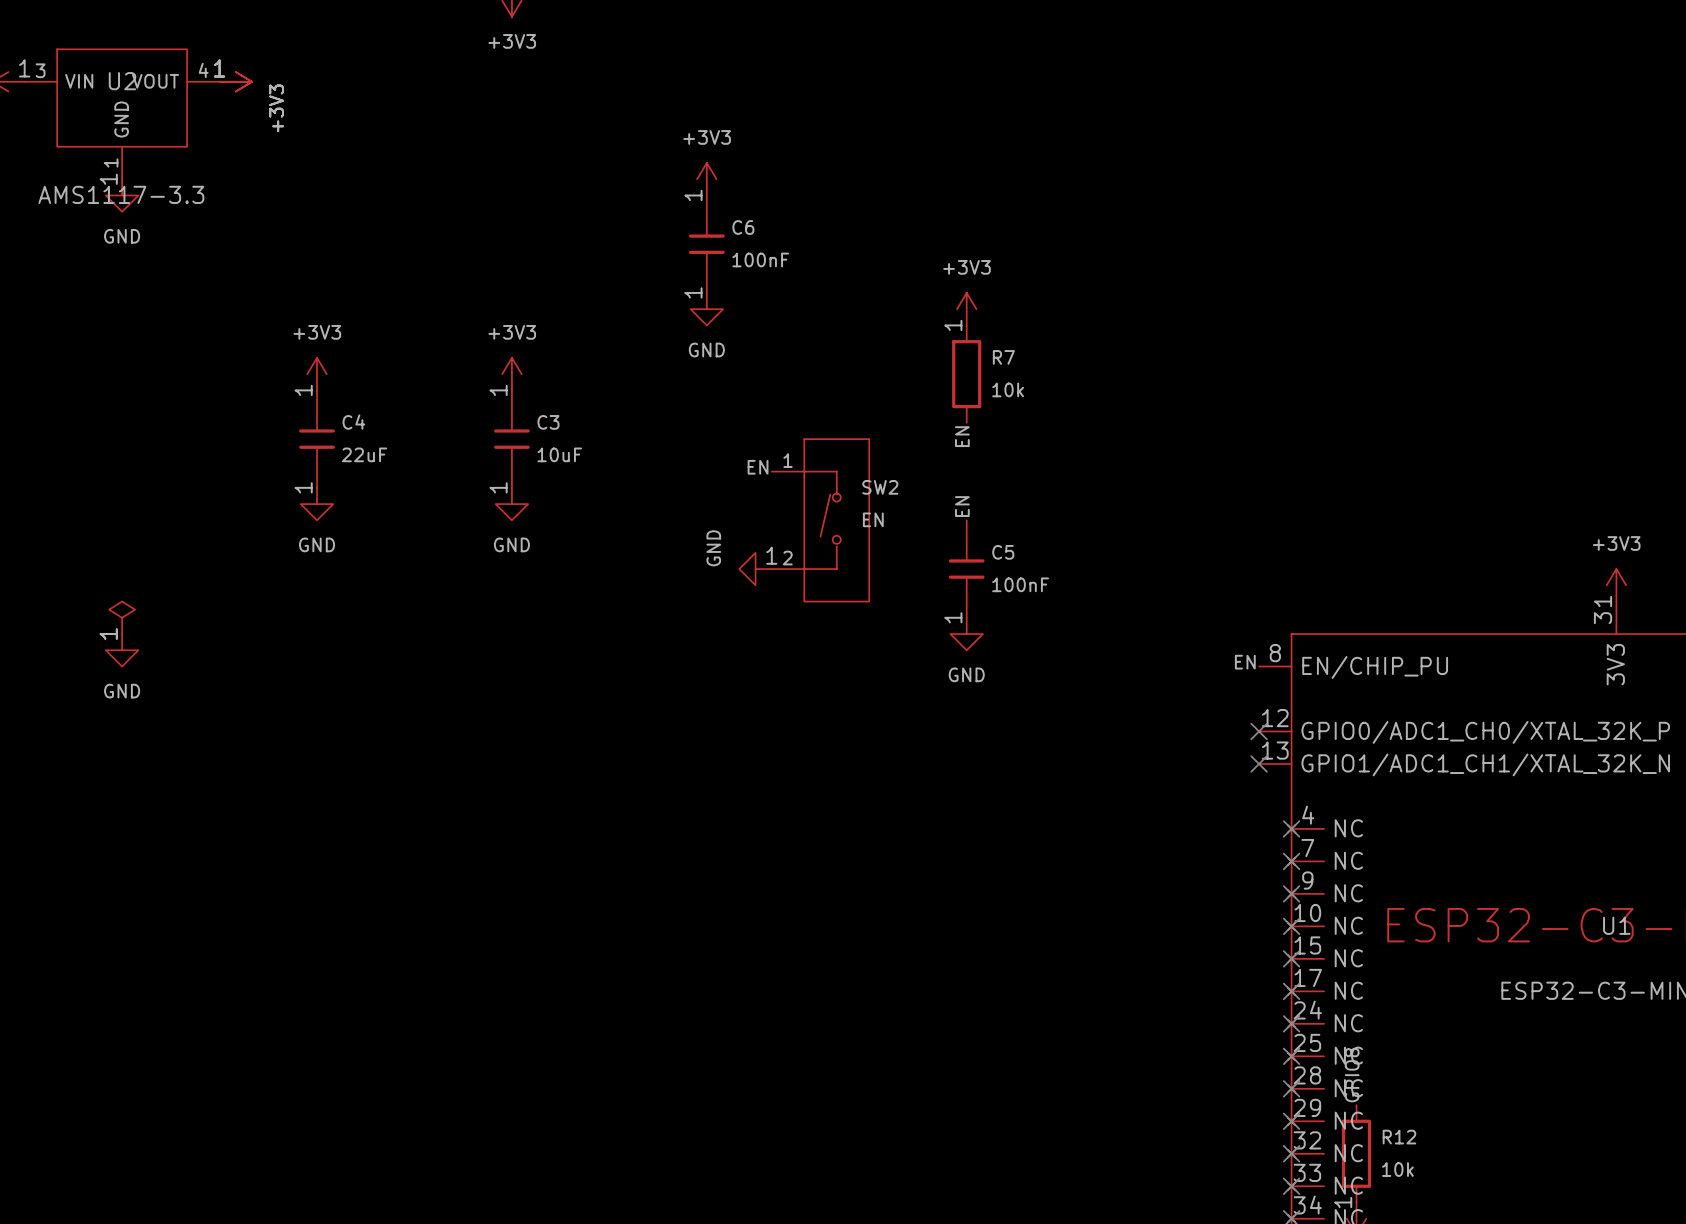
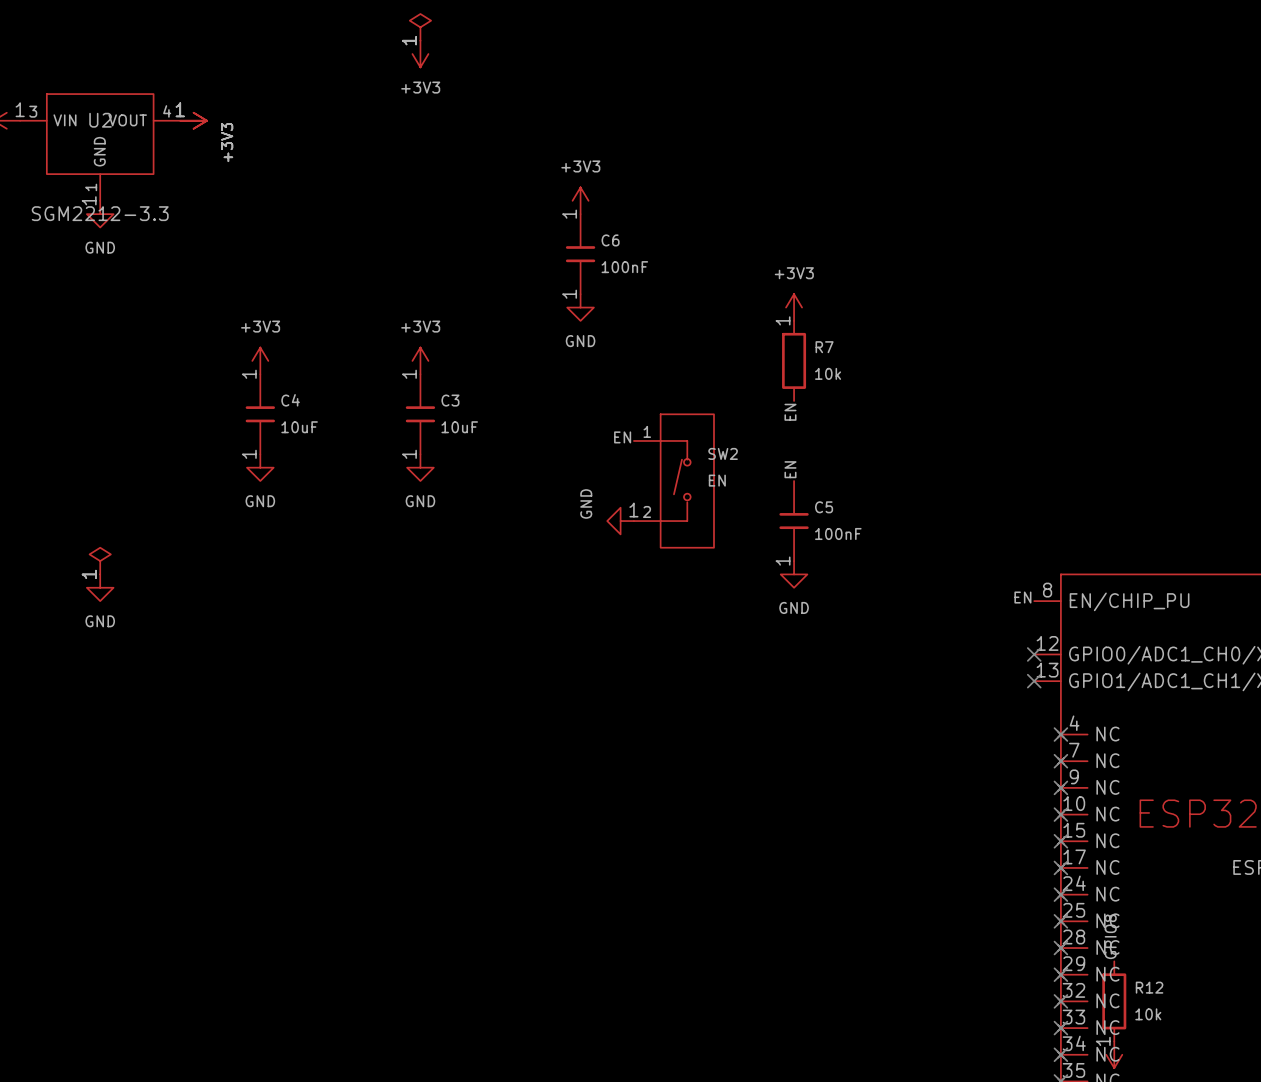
U2 value: AMS1117-3.3 (121, 194) -> SGM2212-3.3 (100, 213)
C4 value: 22uF (364, 454) -> 10uF (299, 427)

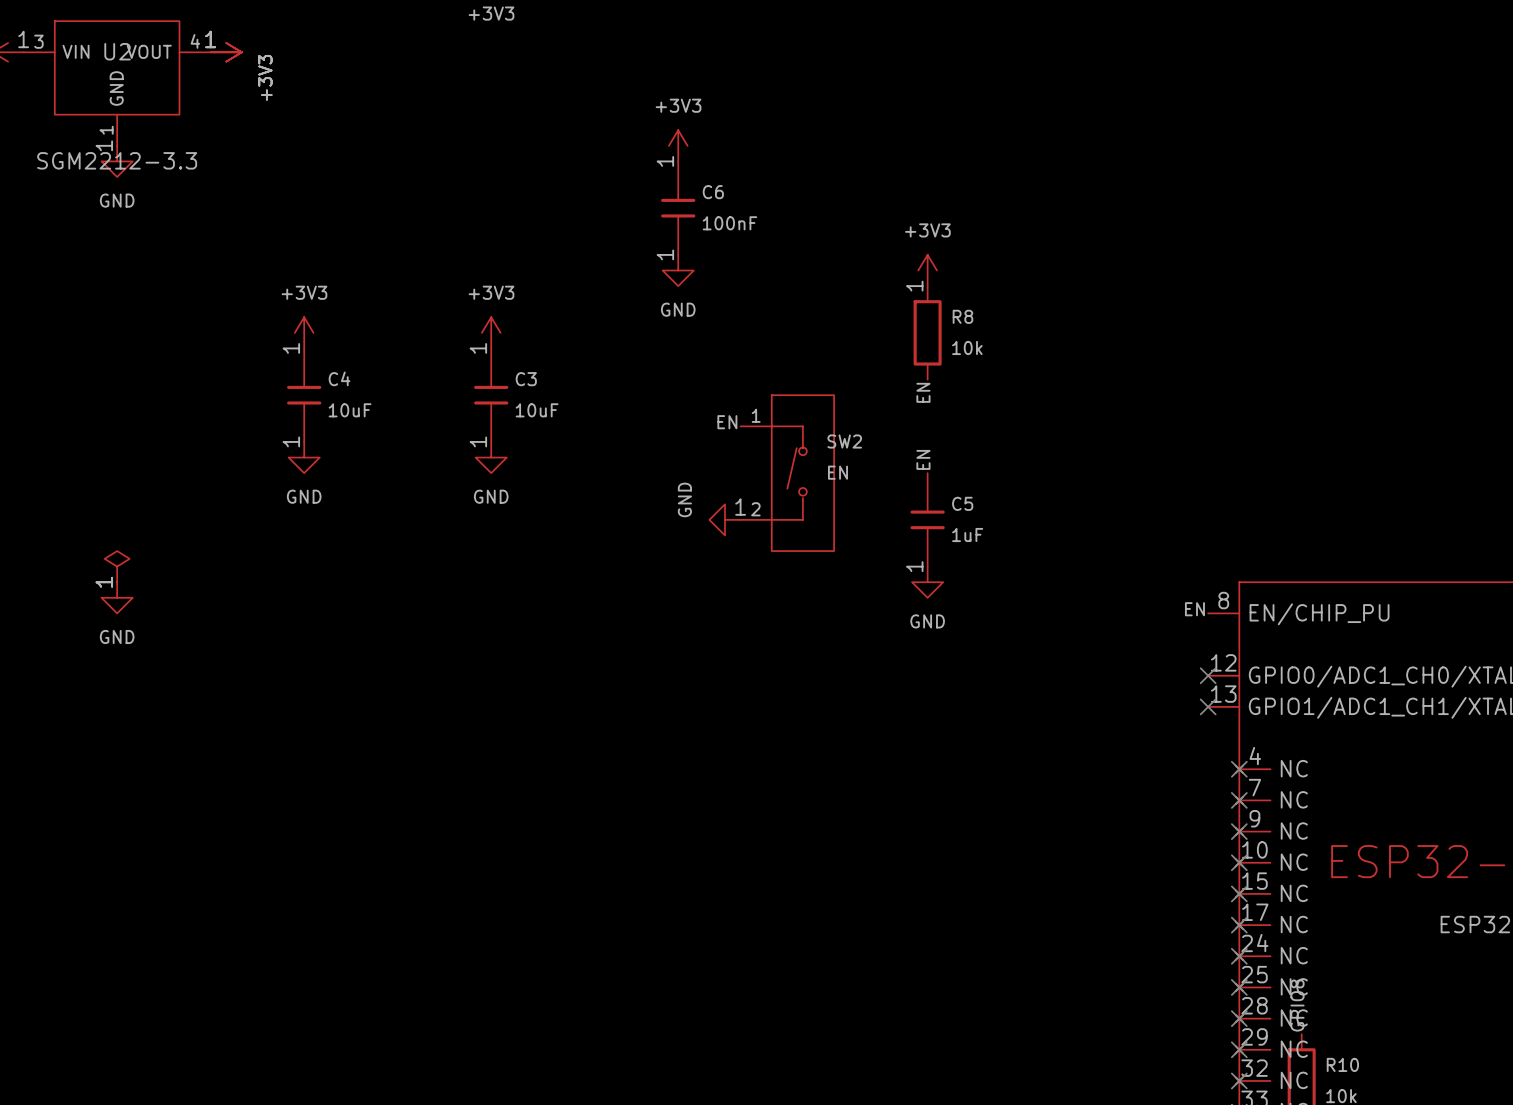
R7 name: R7 (824, 347) -> R8 (962, 316)
C5 value: 100nF (838, 533) -> 1uF (967, 535)
R12 name: R12 (1149, 987) -> R10 (1342, 1064)

